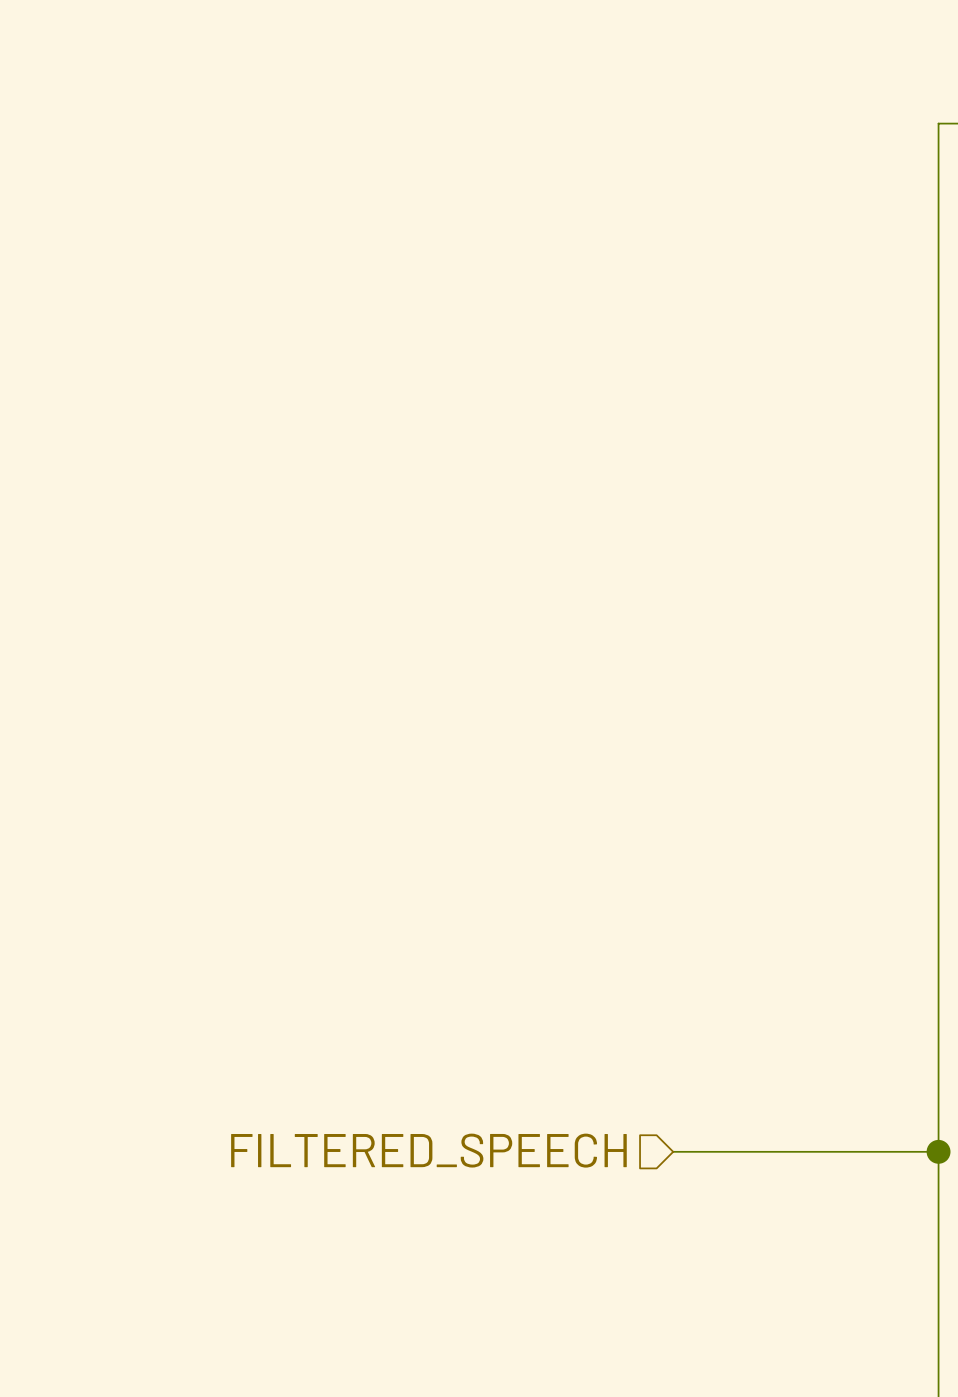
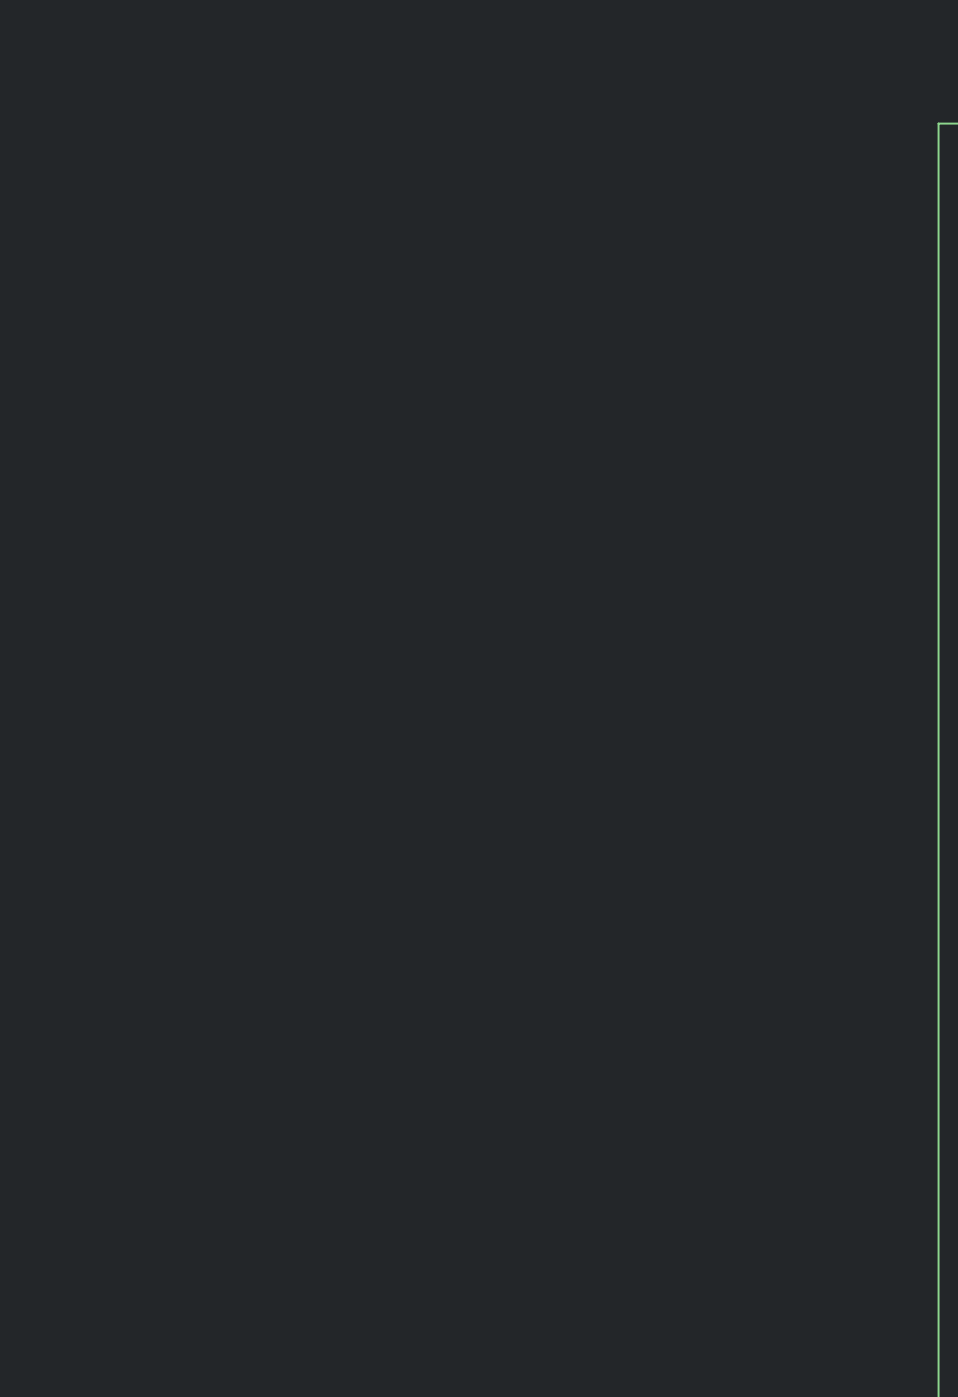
hierarchical label: FILTERED_SPEECH (428, 1150) -> none
wire: (673, 1151) (938, 1151) -> none
junction: (938, 1151) -> none

